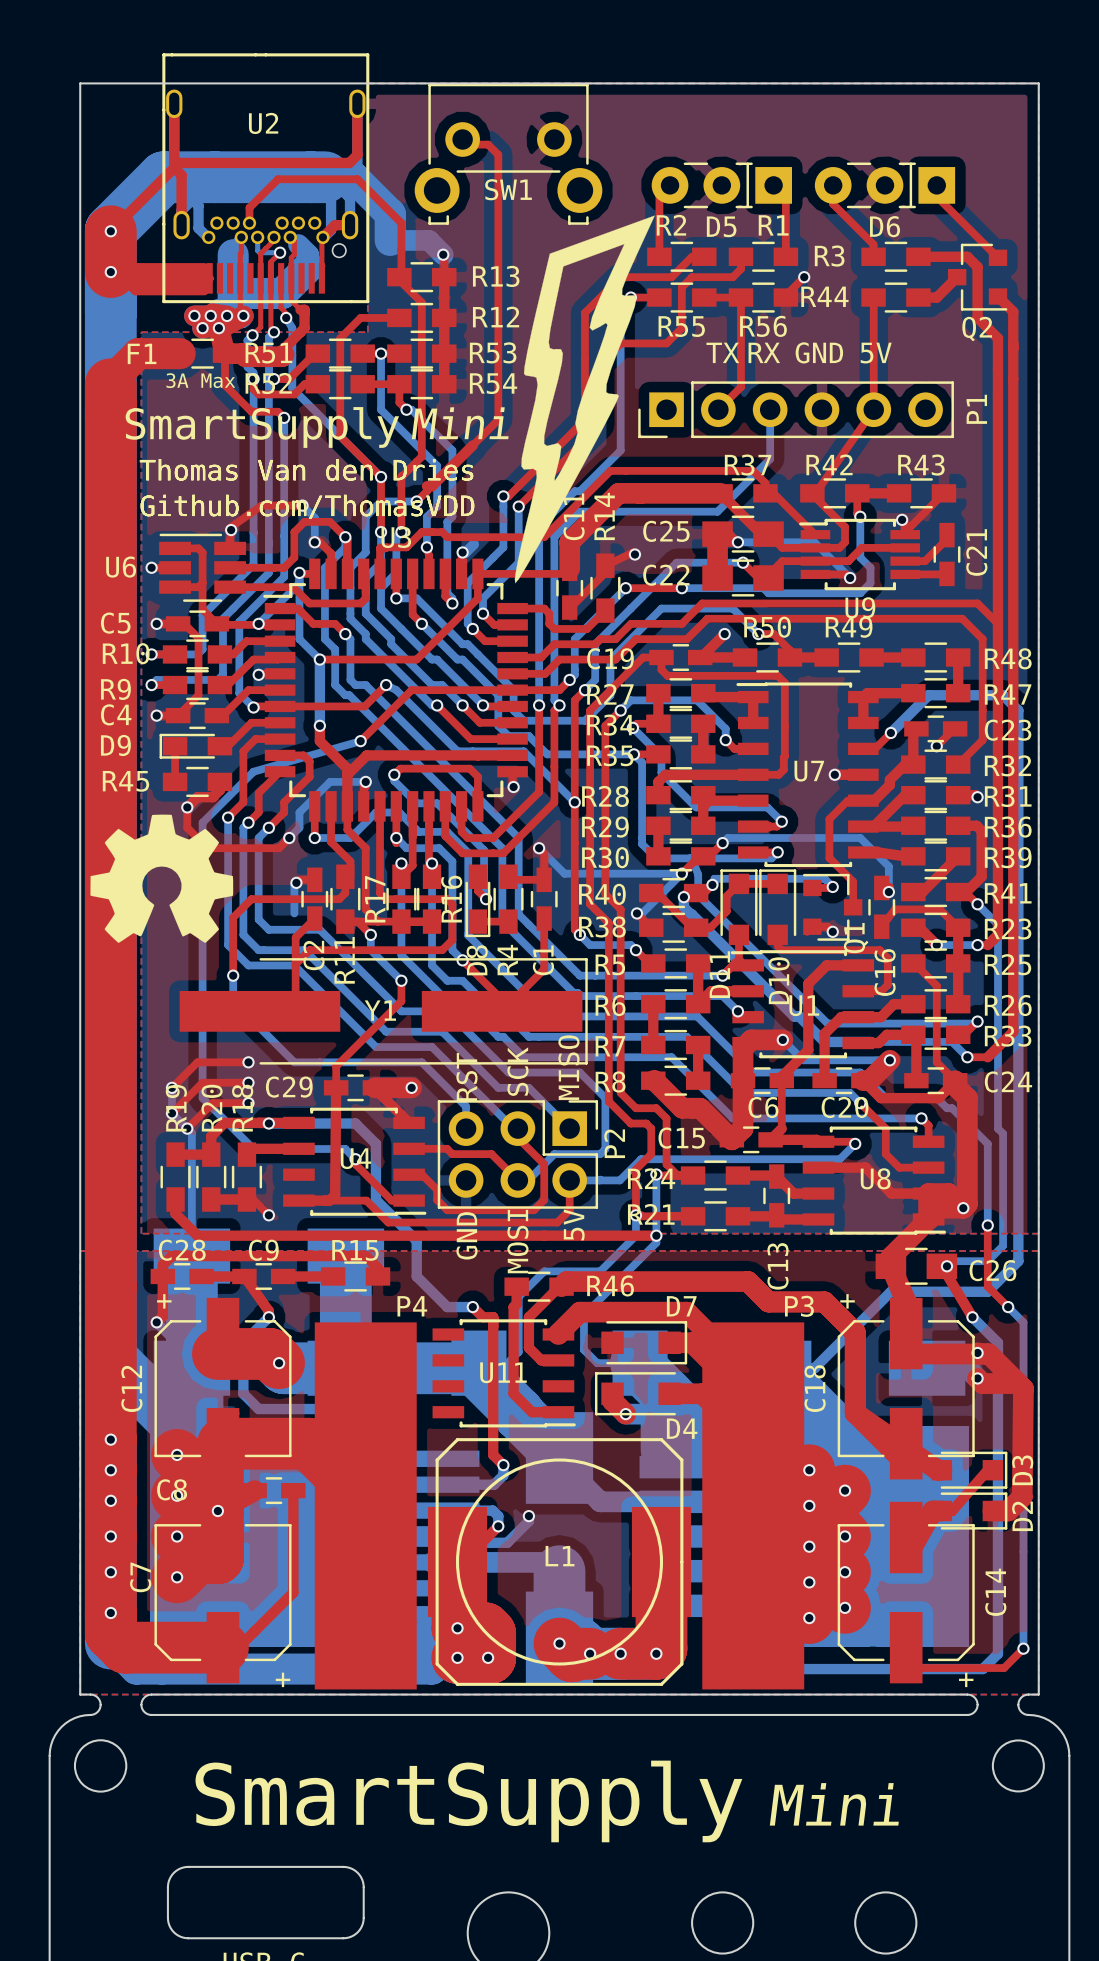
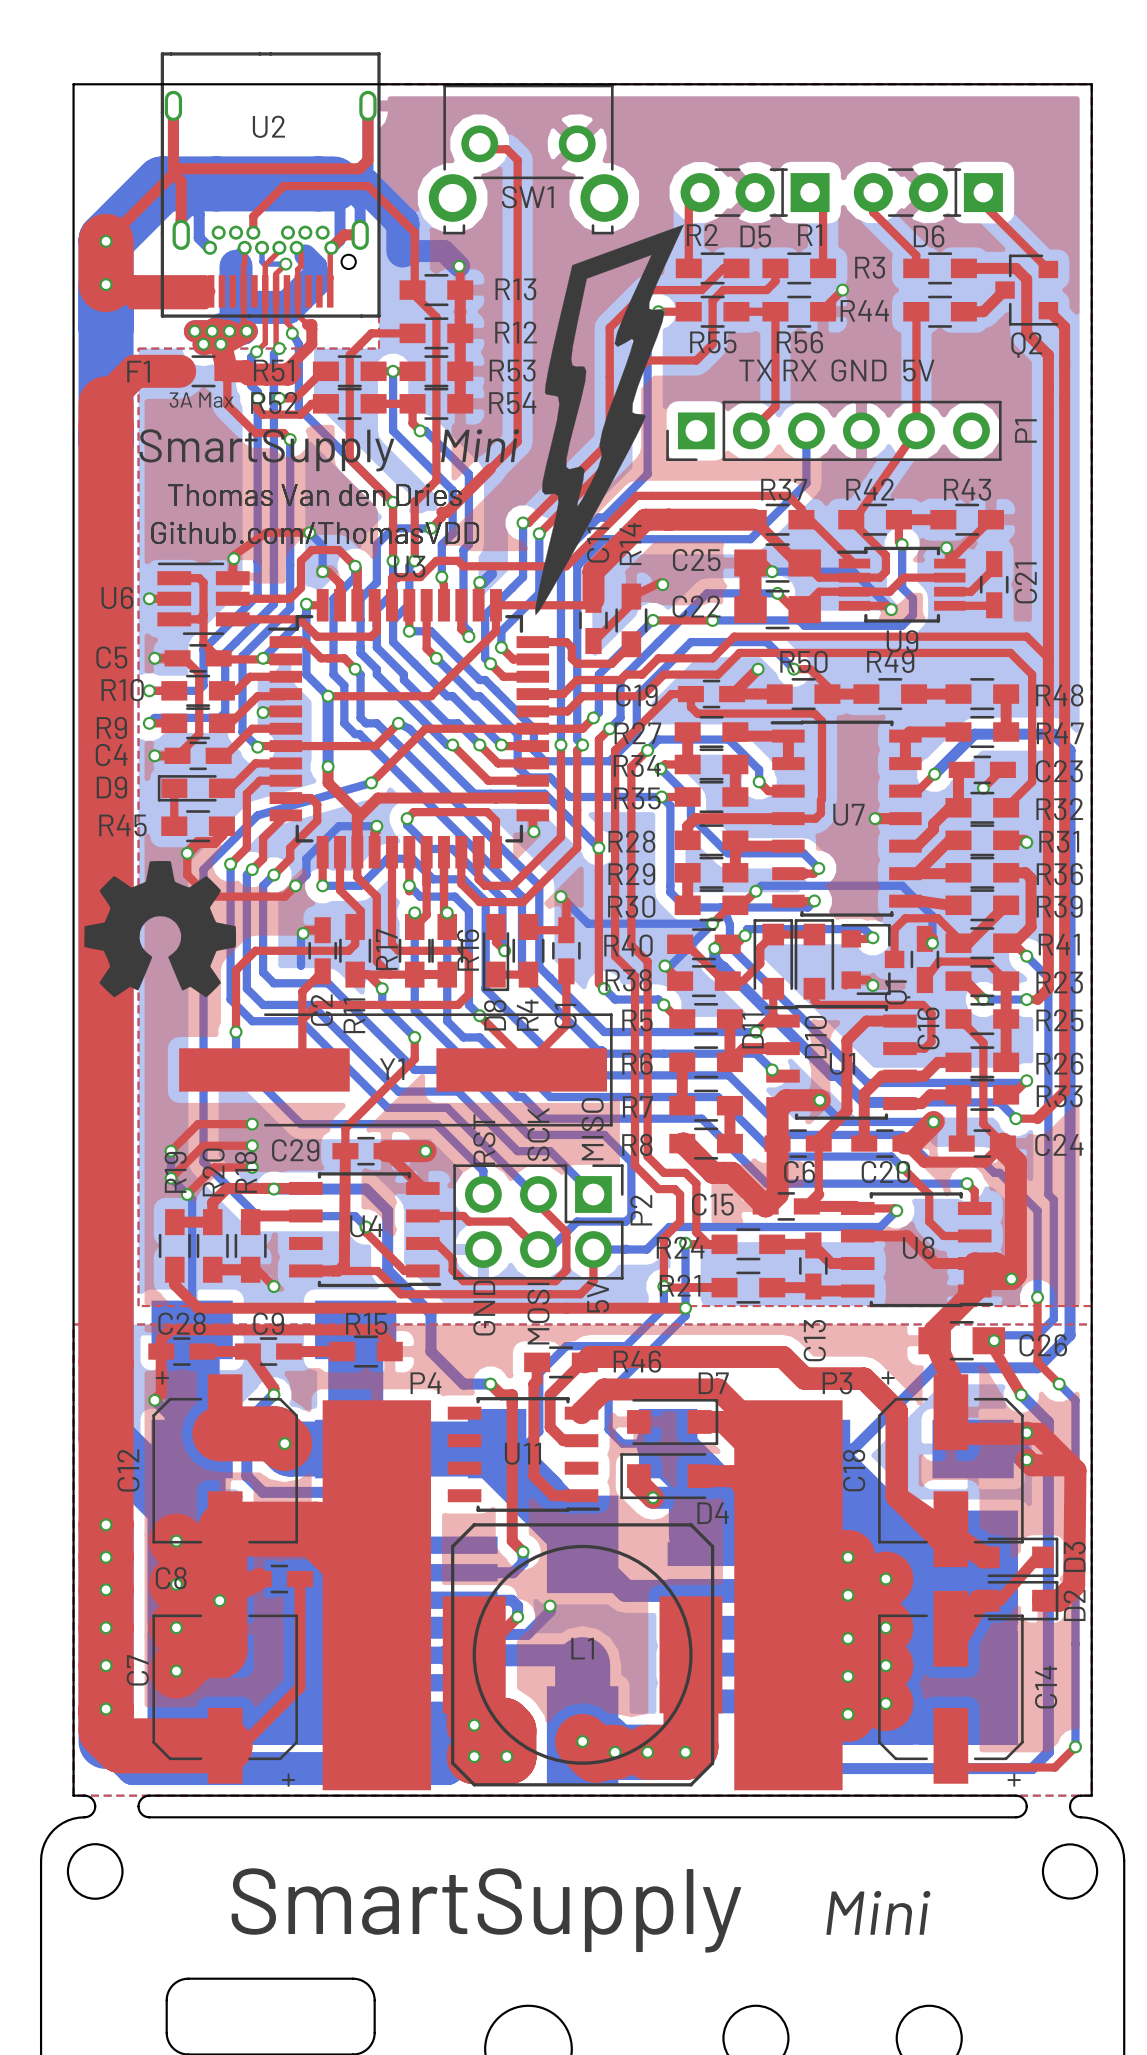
top track: (863, 800) (847, 800) (829, 819) (829, 857) (853, 881) -> (958, 938) (937, 918) (905, 918) (894, 929) (894, 932)

